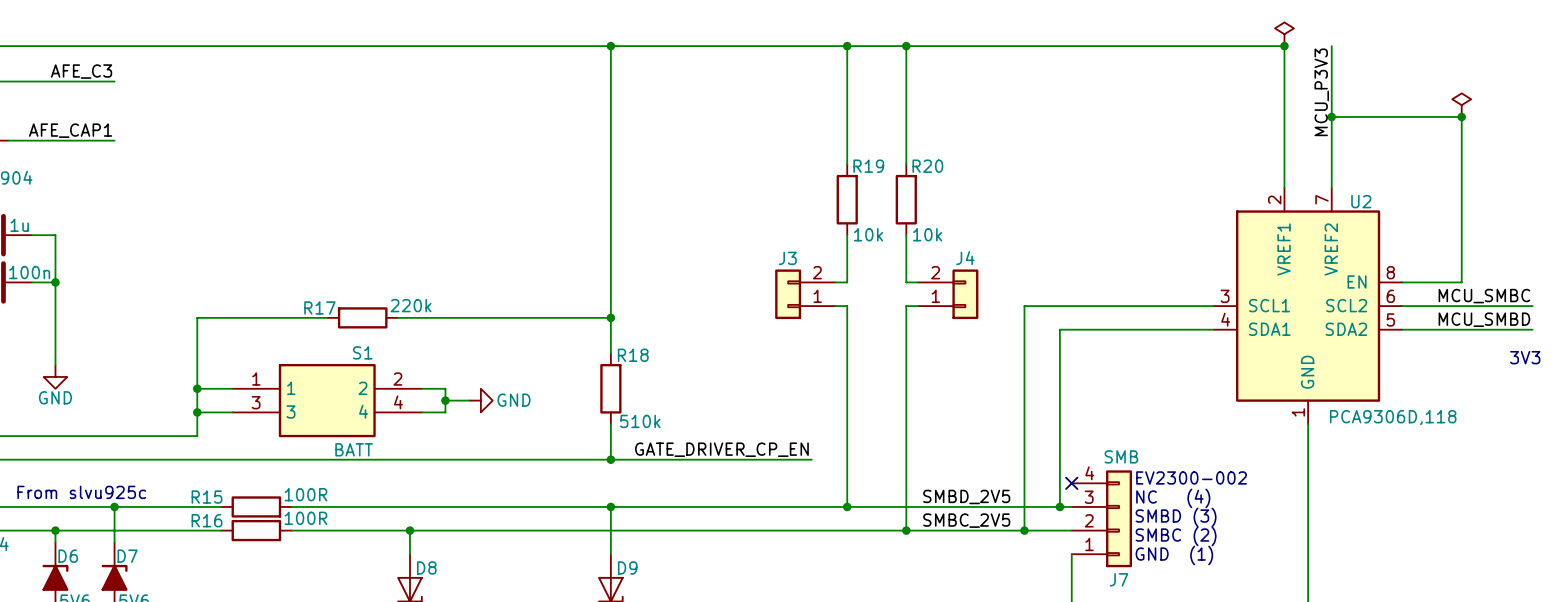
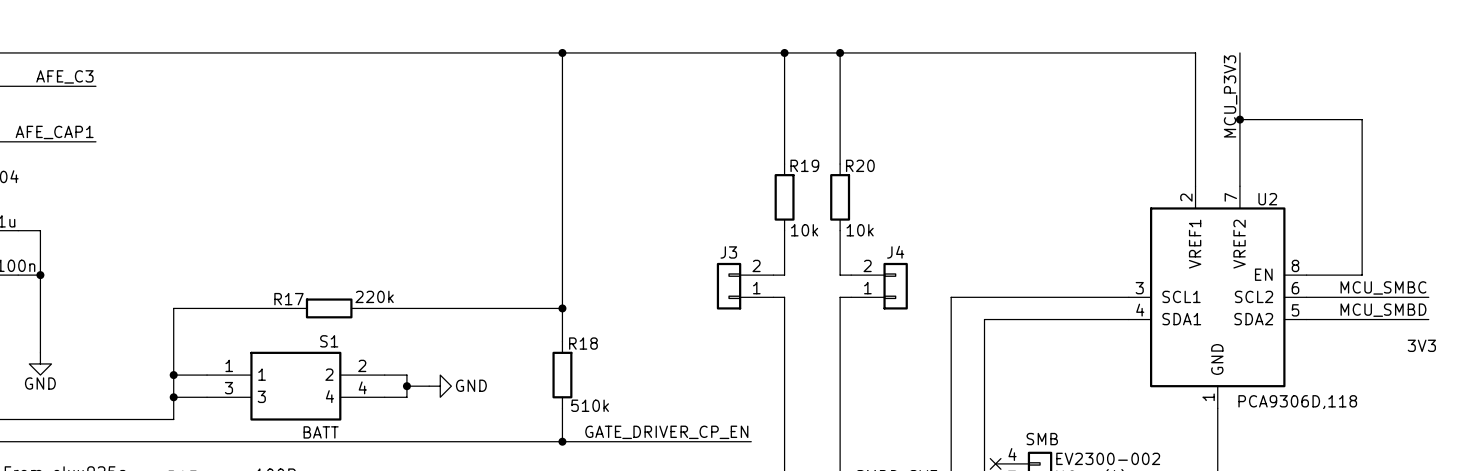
power symbol: (1284, 34) -> none
junction: (1284, 46) -> none
power symbol: (1461, 105) -> none
junction: (1461, 116) -> none

